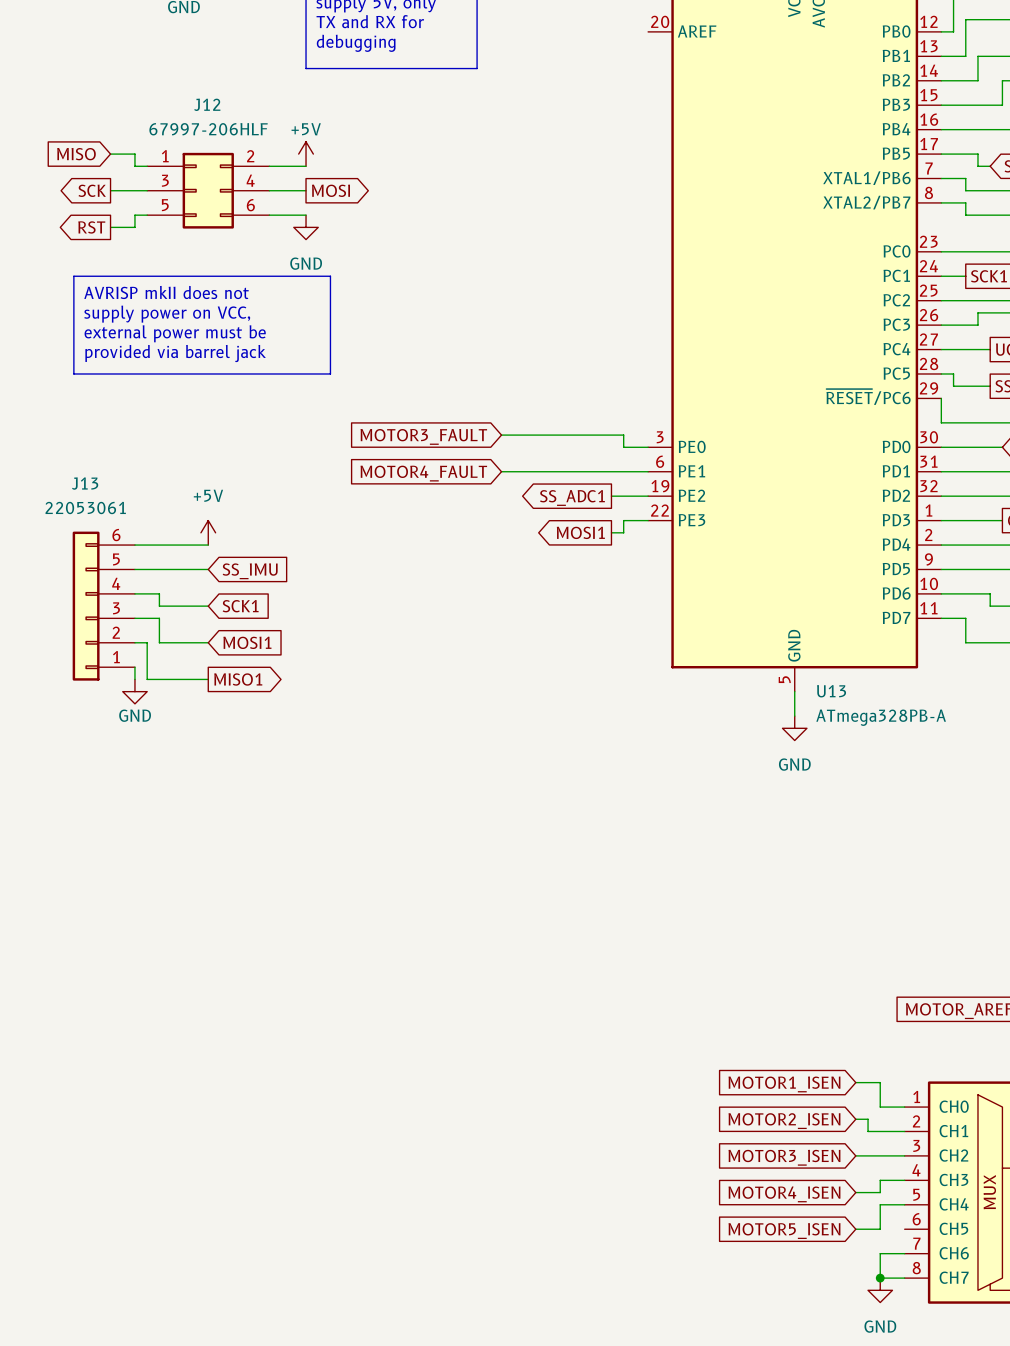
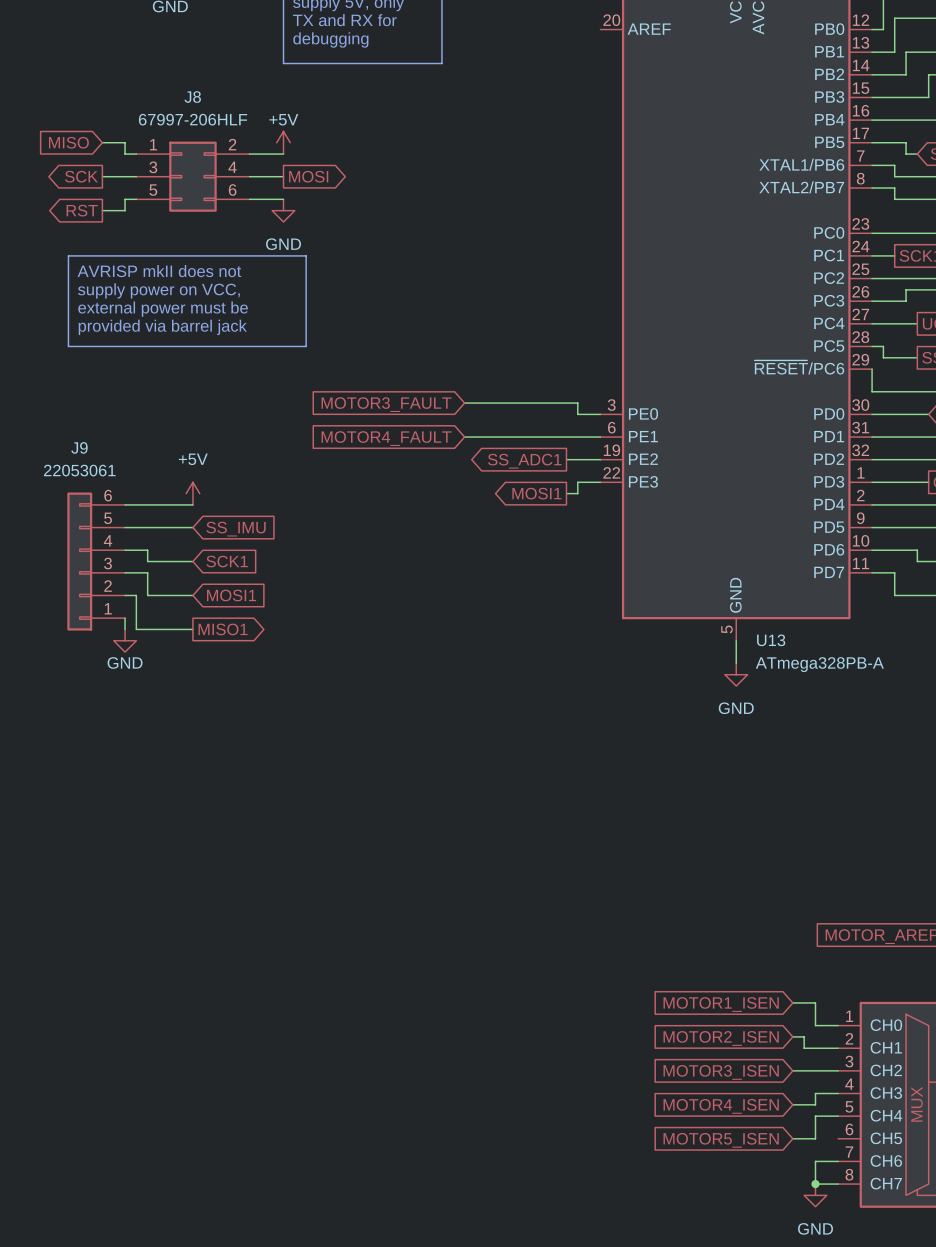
J12 name: J12 (207, 104) -> J8 (192, 97)
J13 name: J13 (85, 483) -> J9 (79, 447)

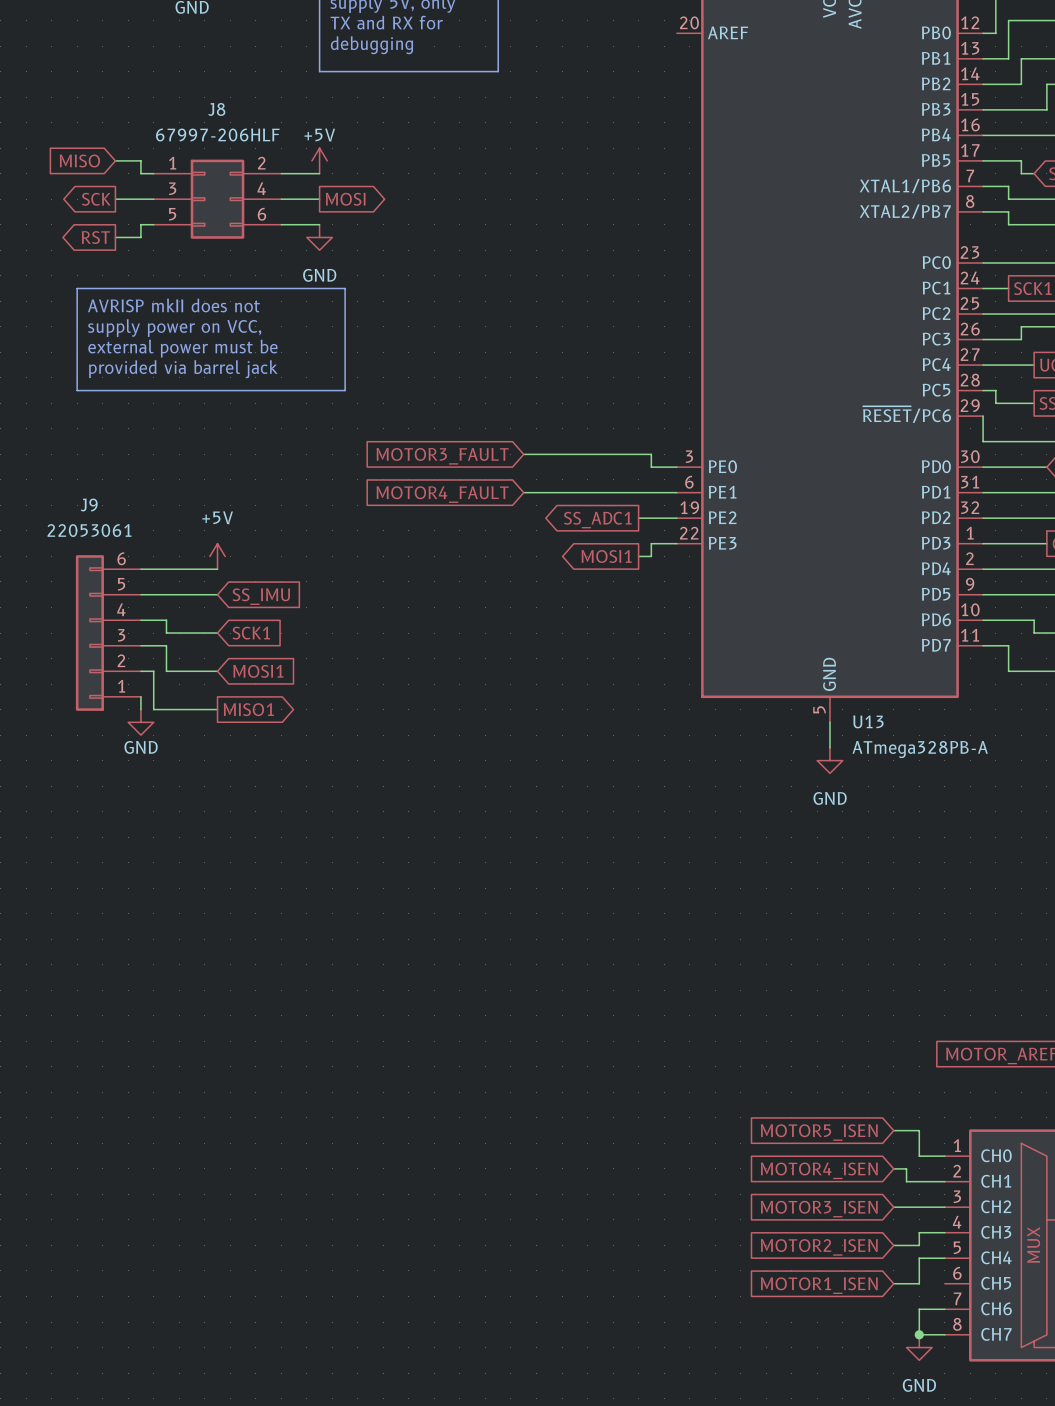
global label: MOTOR1_ISEN (721, 1004) -> MOTOR5_ISEN (819, 1132)
global label: MOTOR2_ISEN (721, 1038) -> MOTOR4_ISEN (819, 1170)
global label: MOTOR4_ISEN (721, 1106) -> MOTOR2_ISEN (819, 1247)
global label: MOTOR5_ISEN (721, 1140) -> MOTOR1_ISEN (819, 1285)

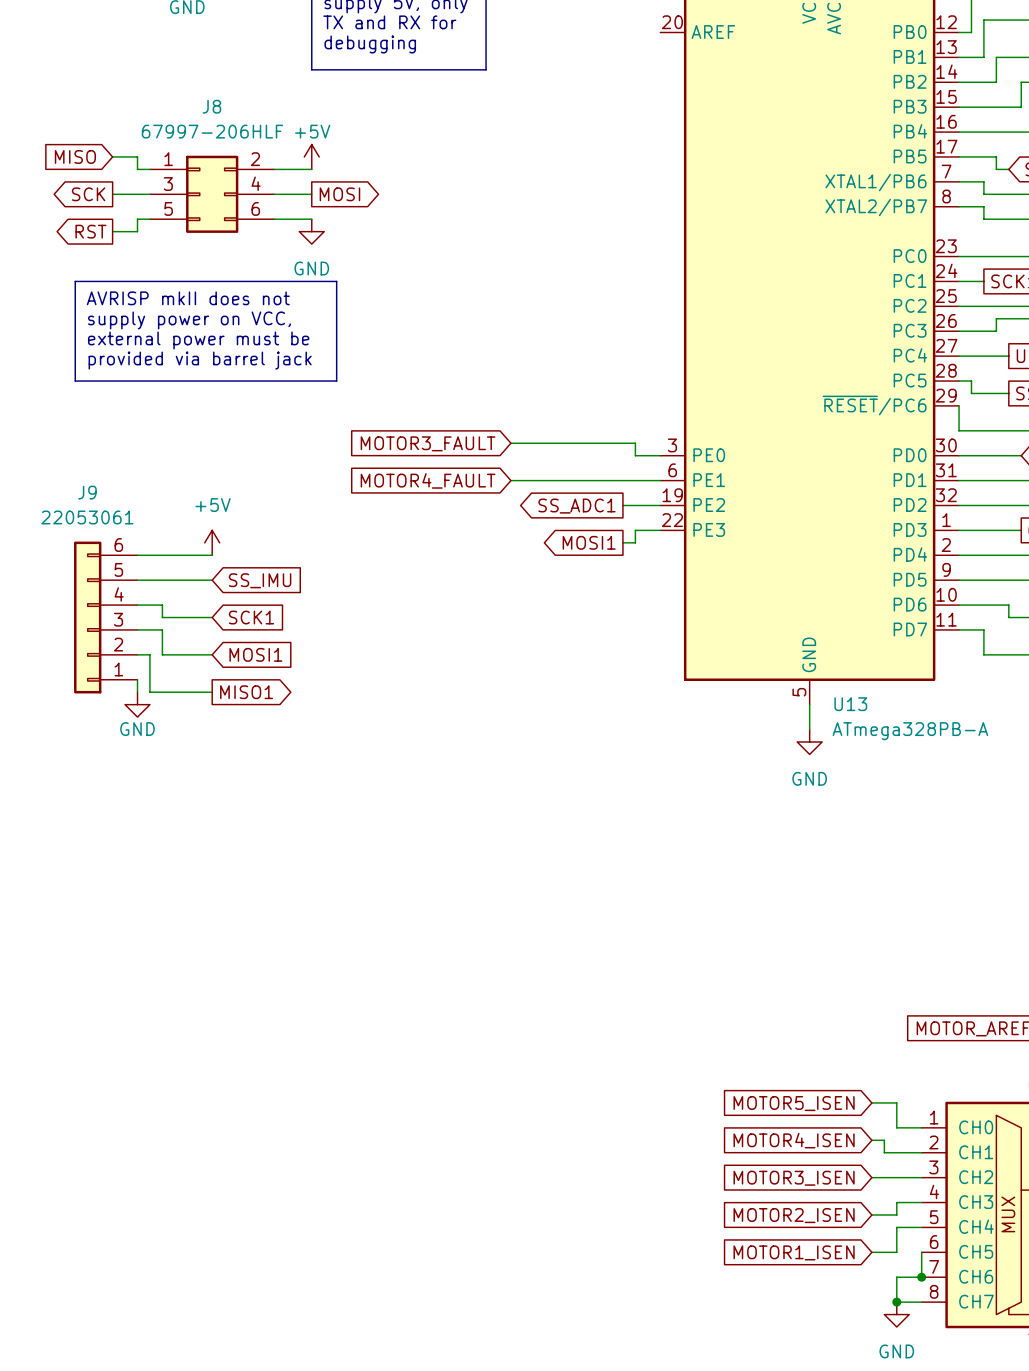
wire: none -> (921, 1252) (921, 1277)
junction: none -> (921, 1277)

